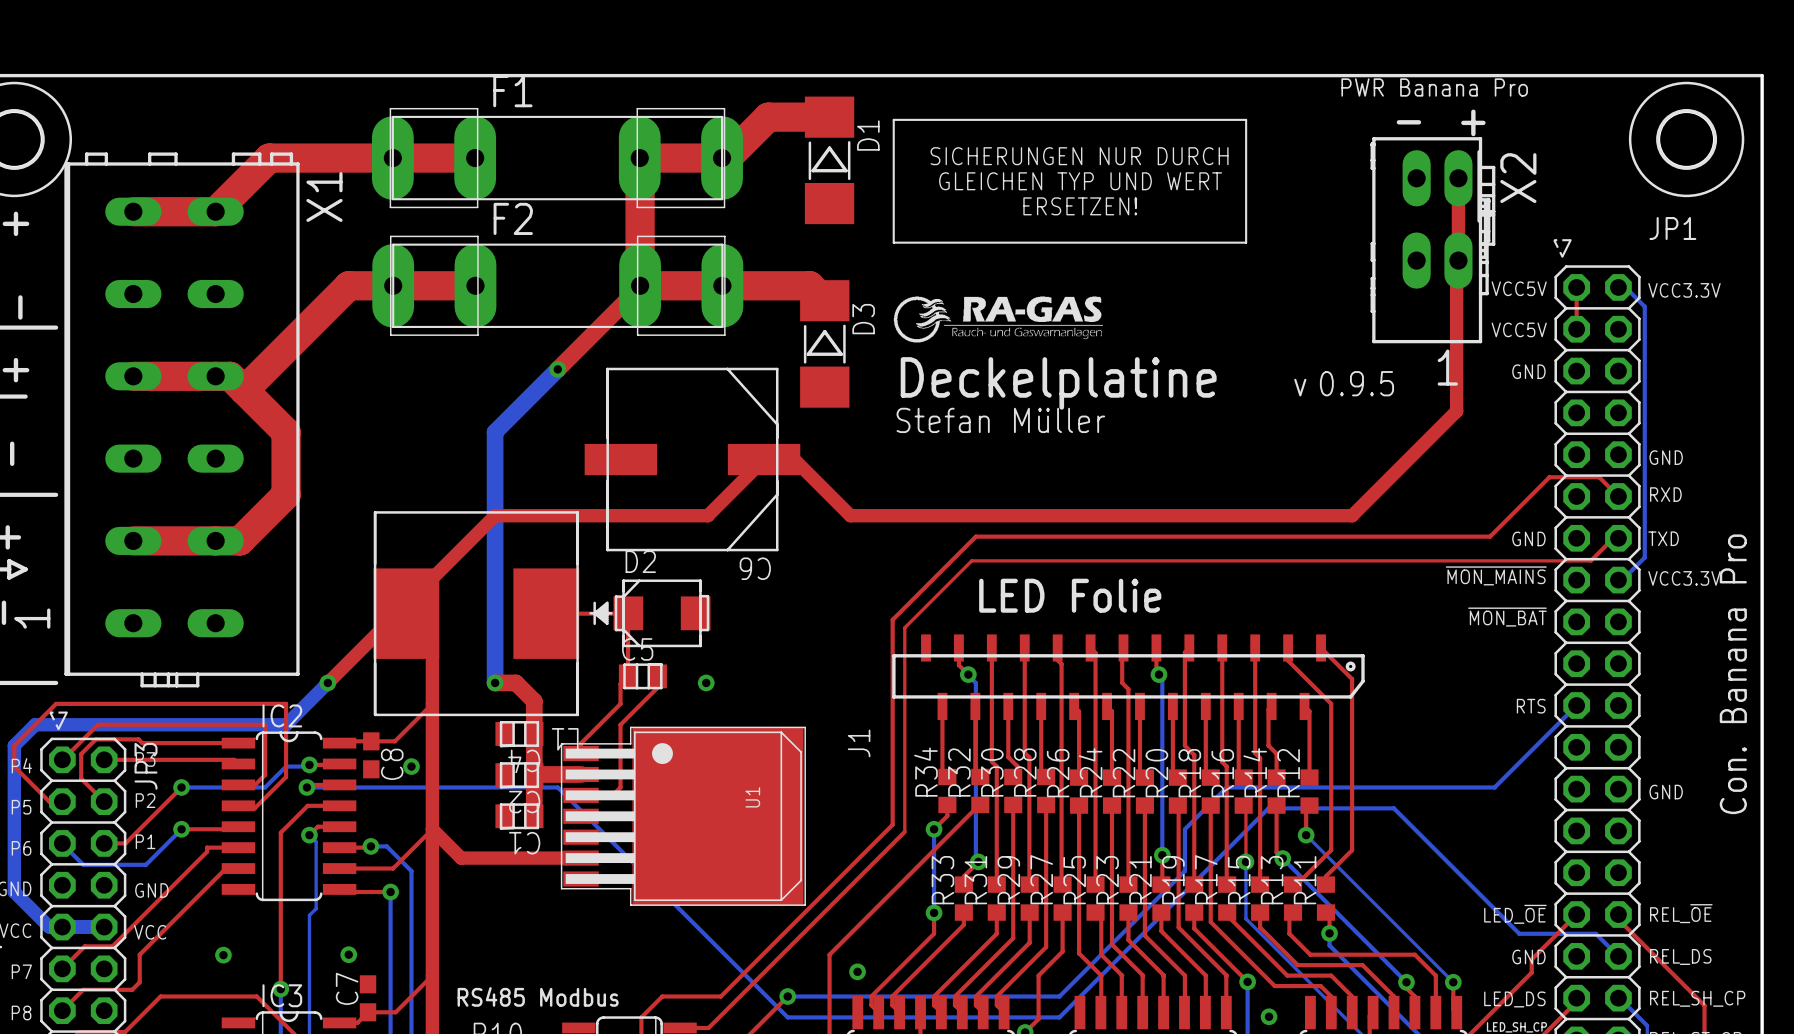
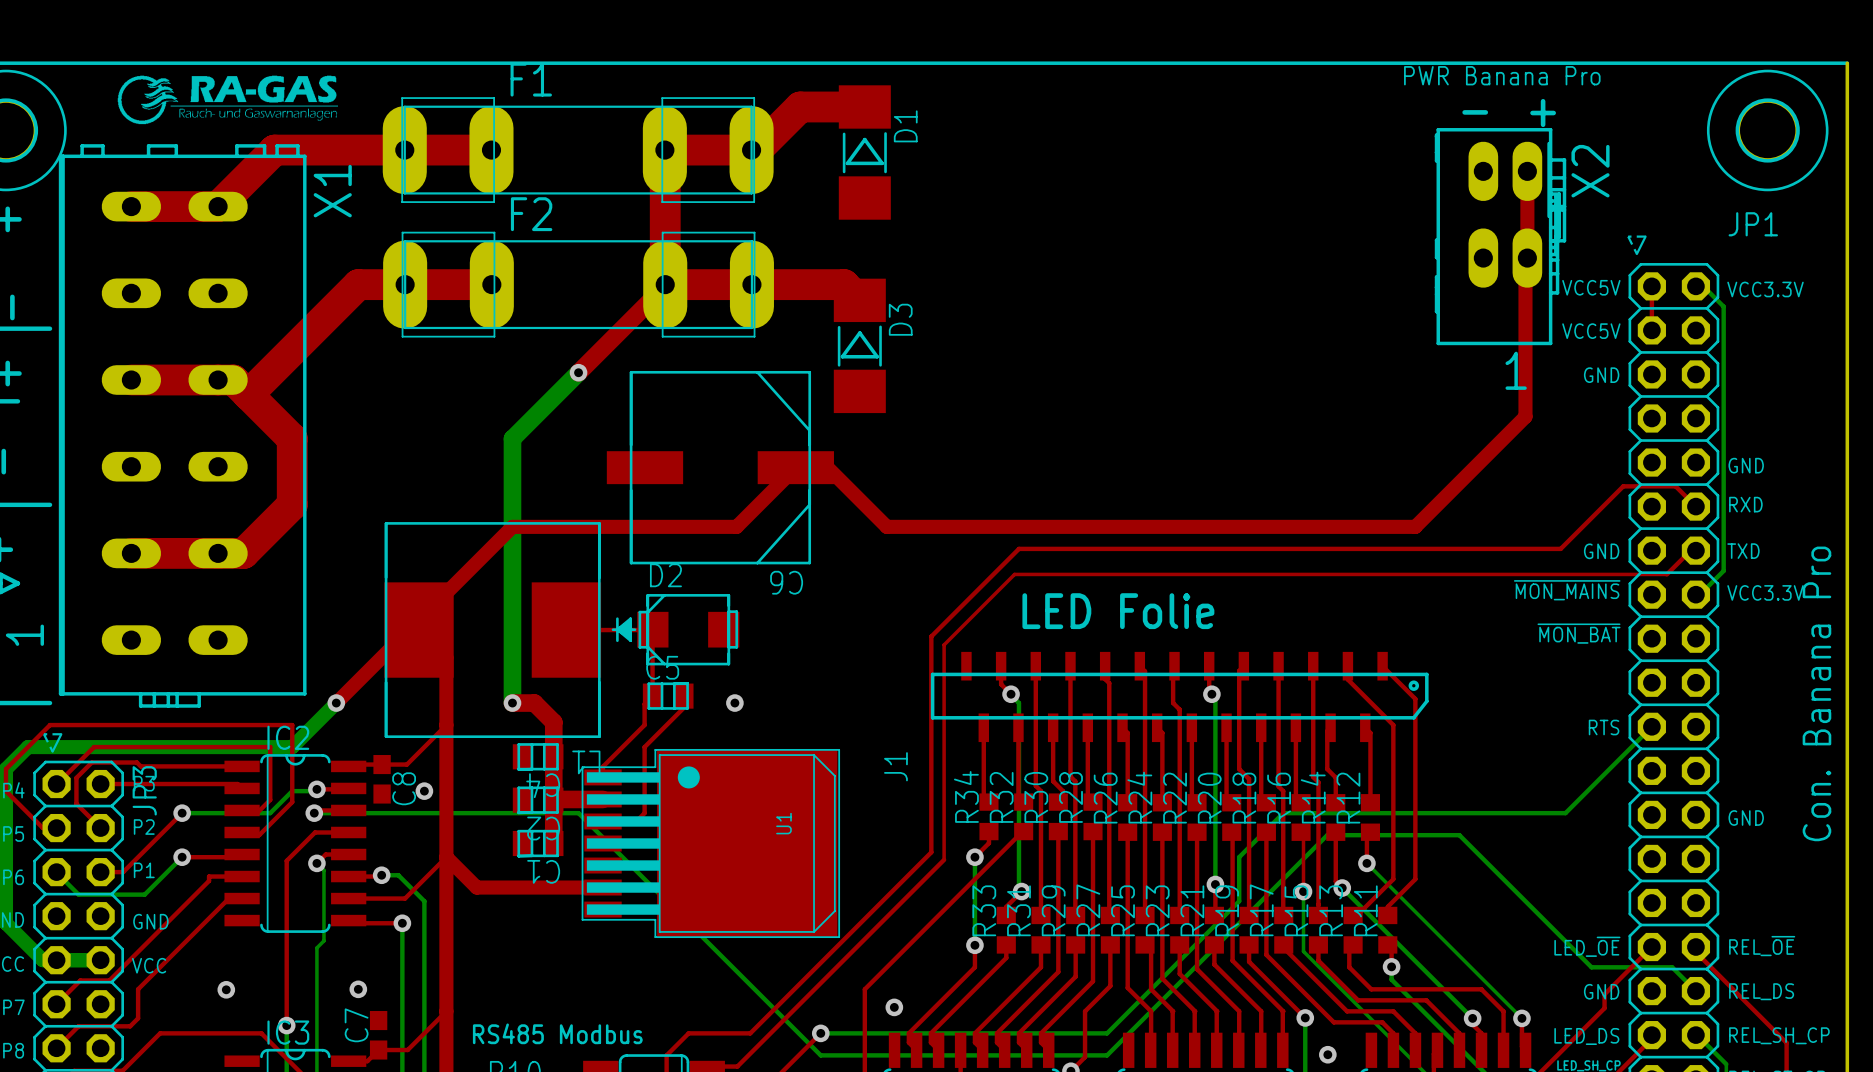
drawing: none -> [117, 75, 338, 125]
drawing: [892, 118, 1248, 244] -> none
drawing: [893, 296, 1103, 343] -> none

